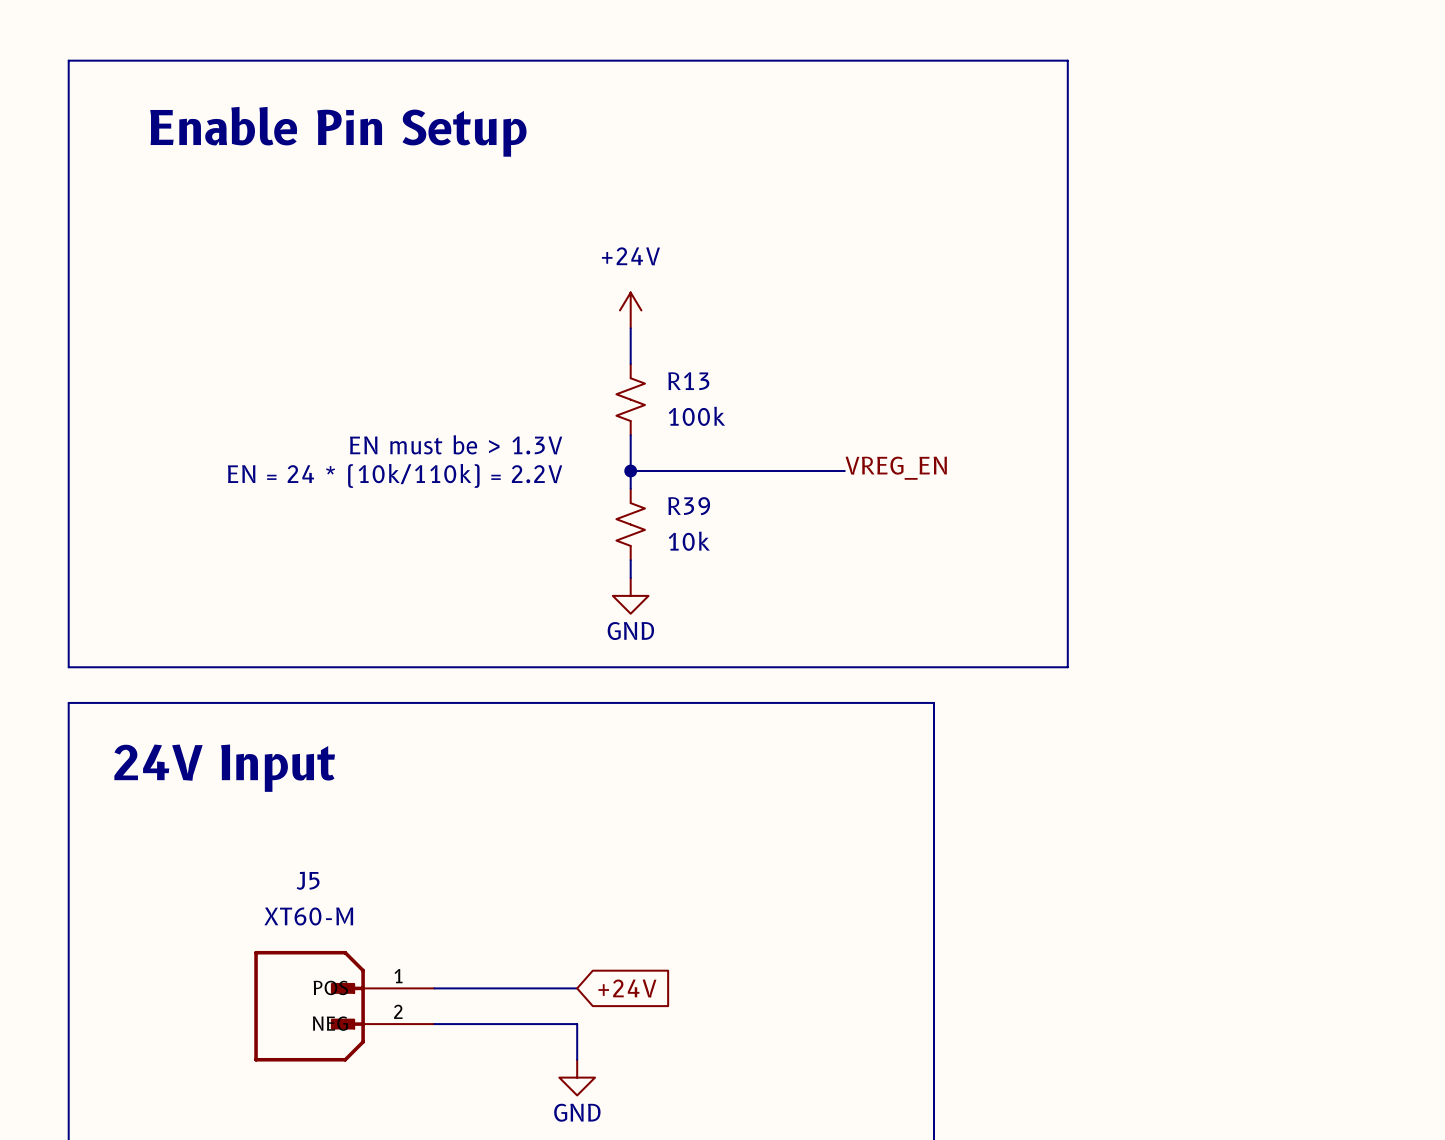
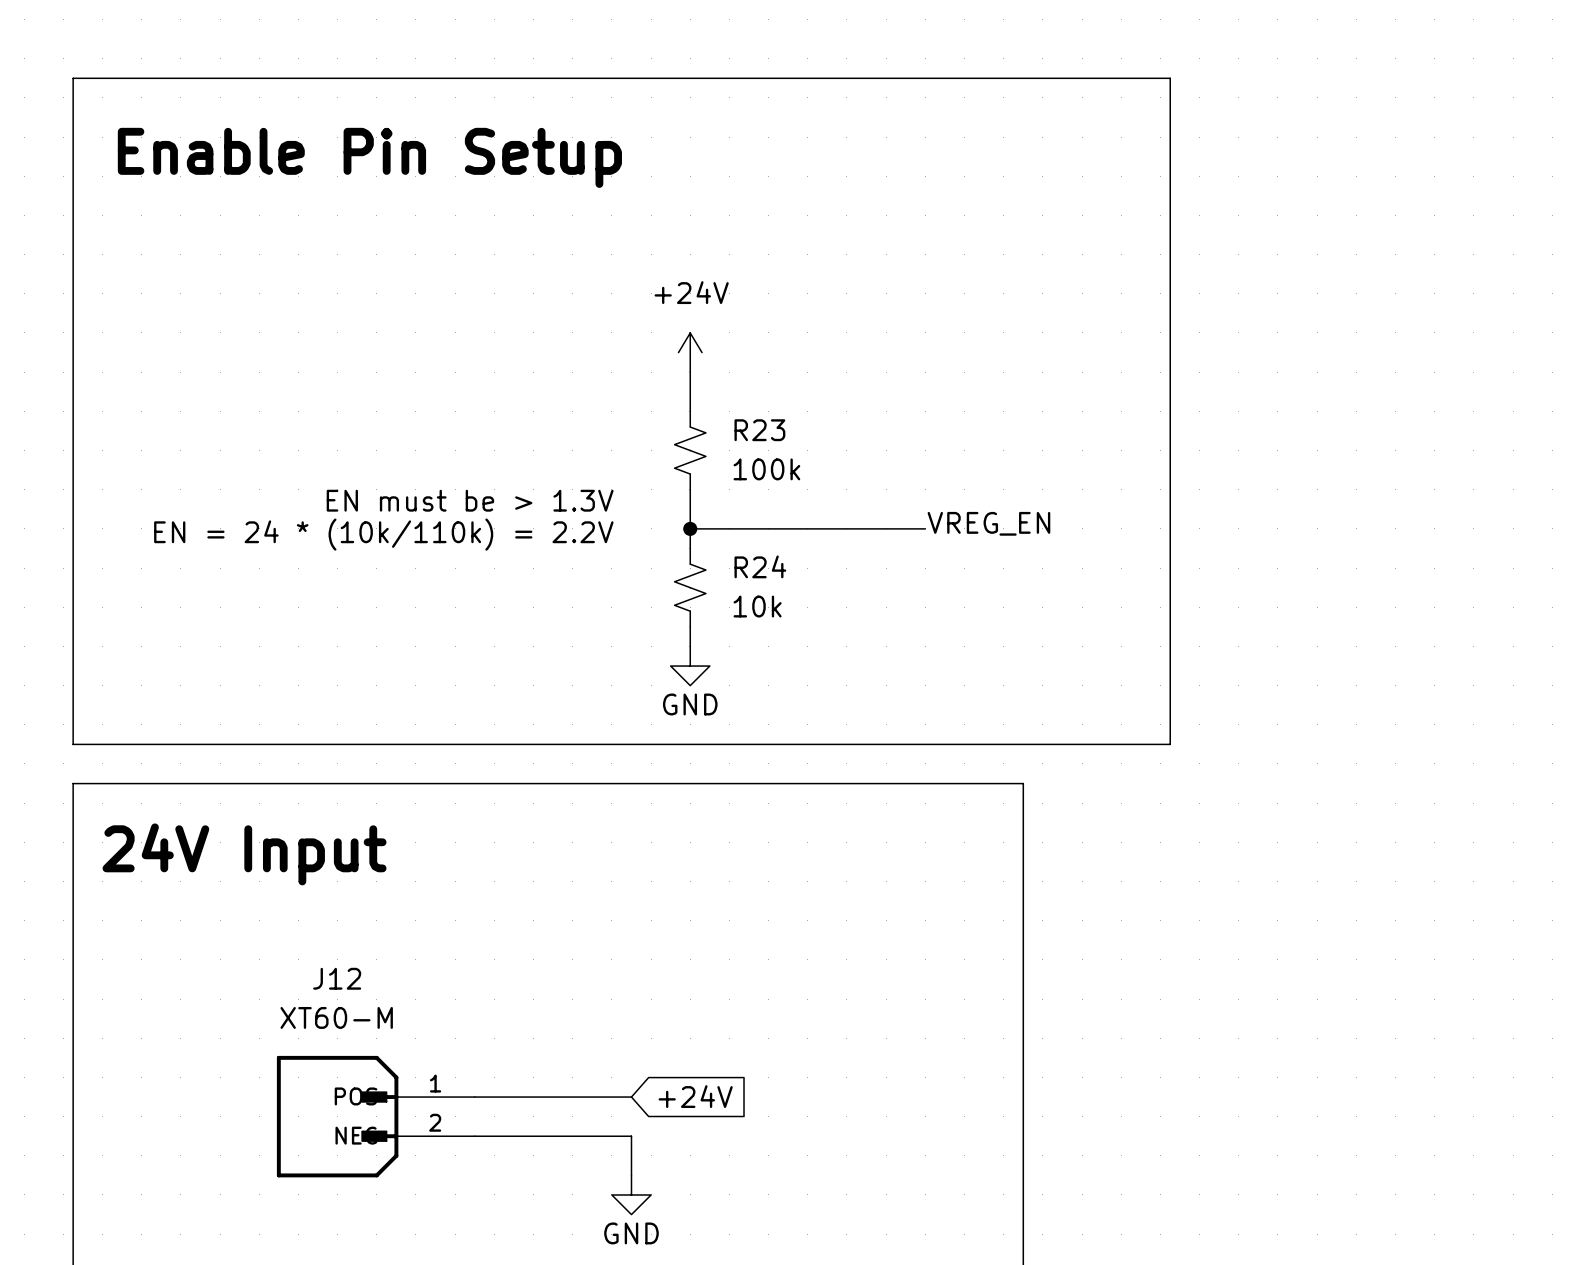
R13 name: R13 (688, 381) -> R23 (759, 430)
R39 name: R39 (689, 506) -> R24 (760, 566)
J5 name: J5 (308, 880) -> J12 (337, 978)

